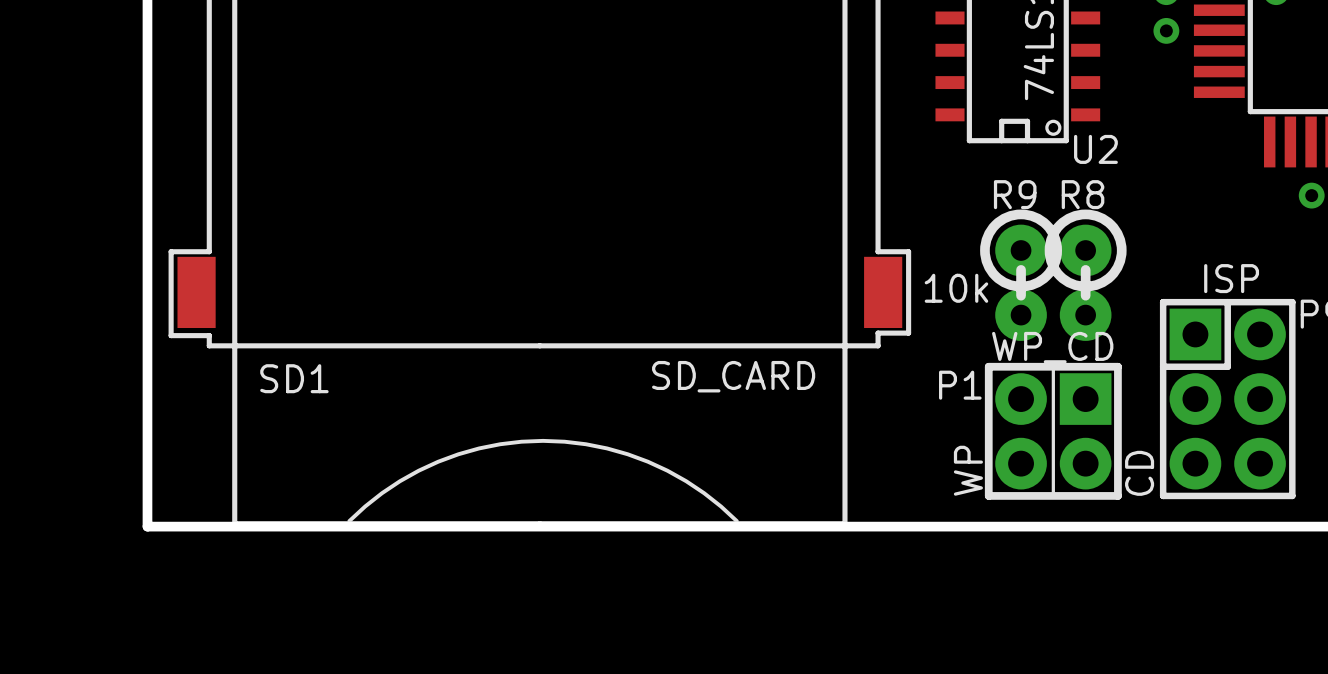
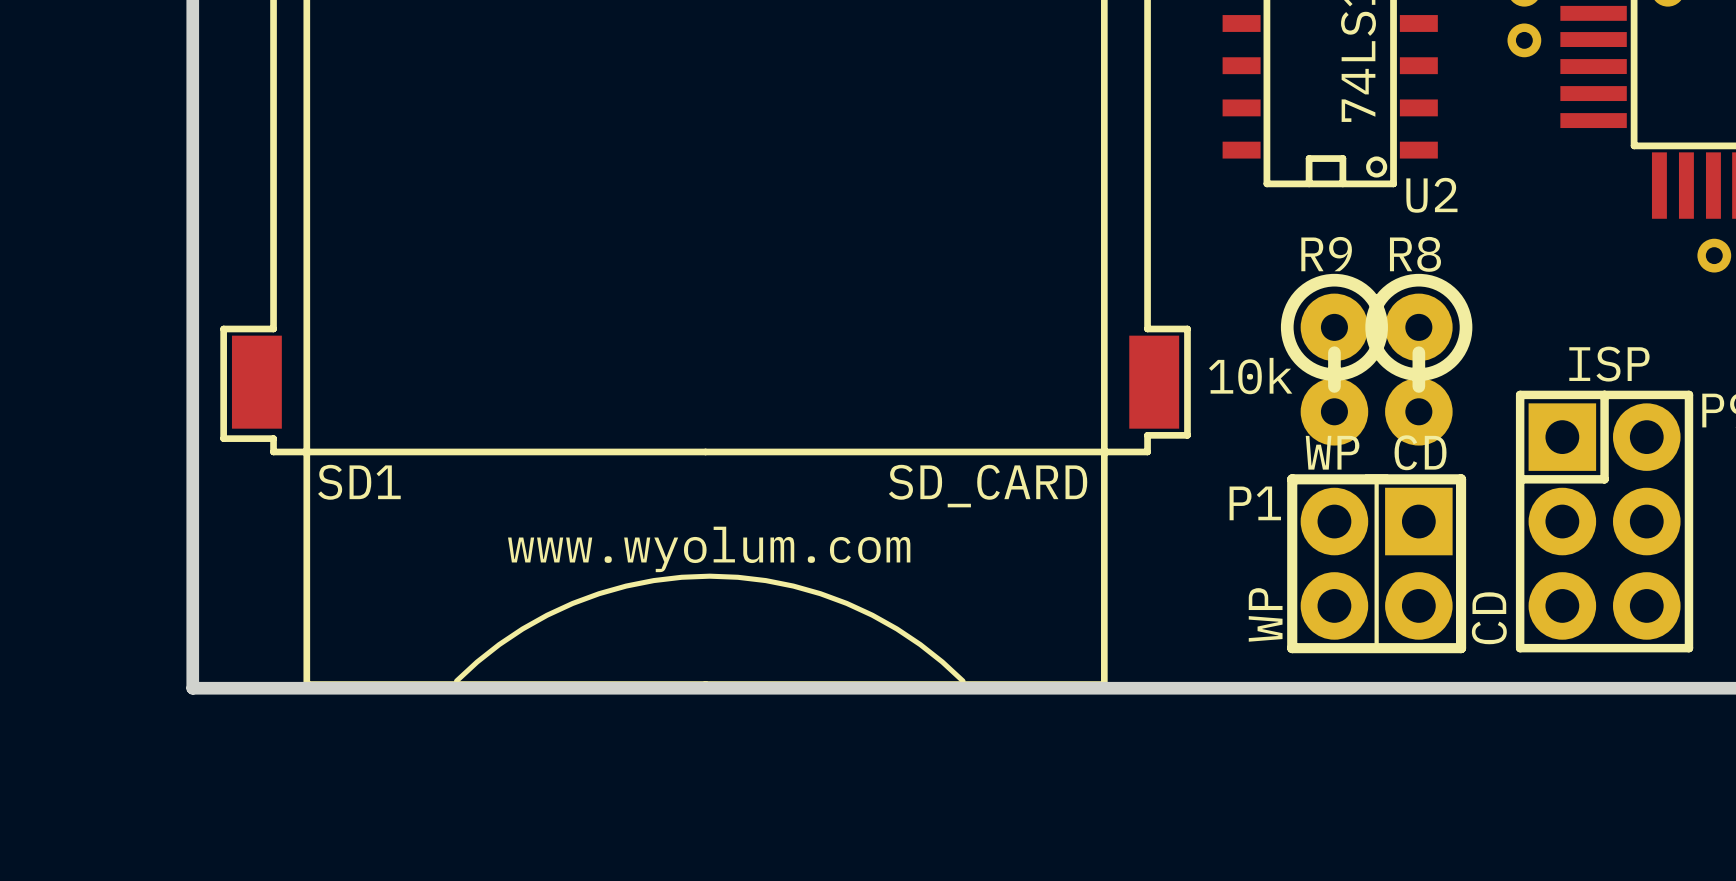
SD1 value position: SD_CARD (733, 376) -> SD_CARD (988, 486)
SD1 name position: SD1 (294, 378) -> SD1 (359, 482)
text: none -> www.wyolum.com (709, 549)

